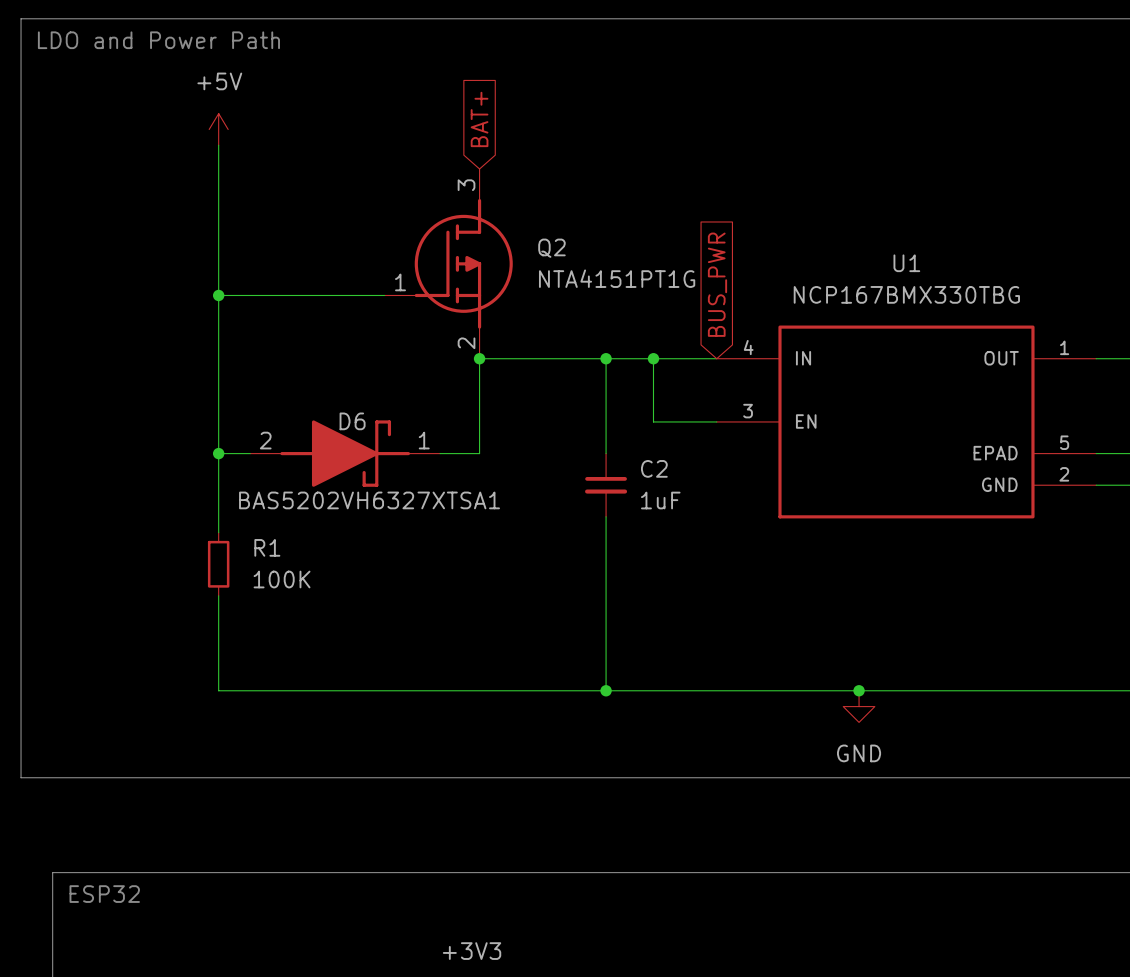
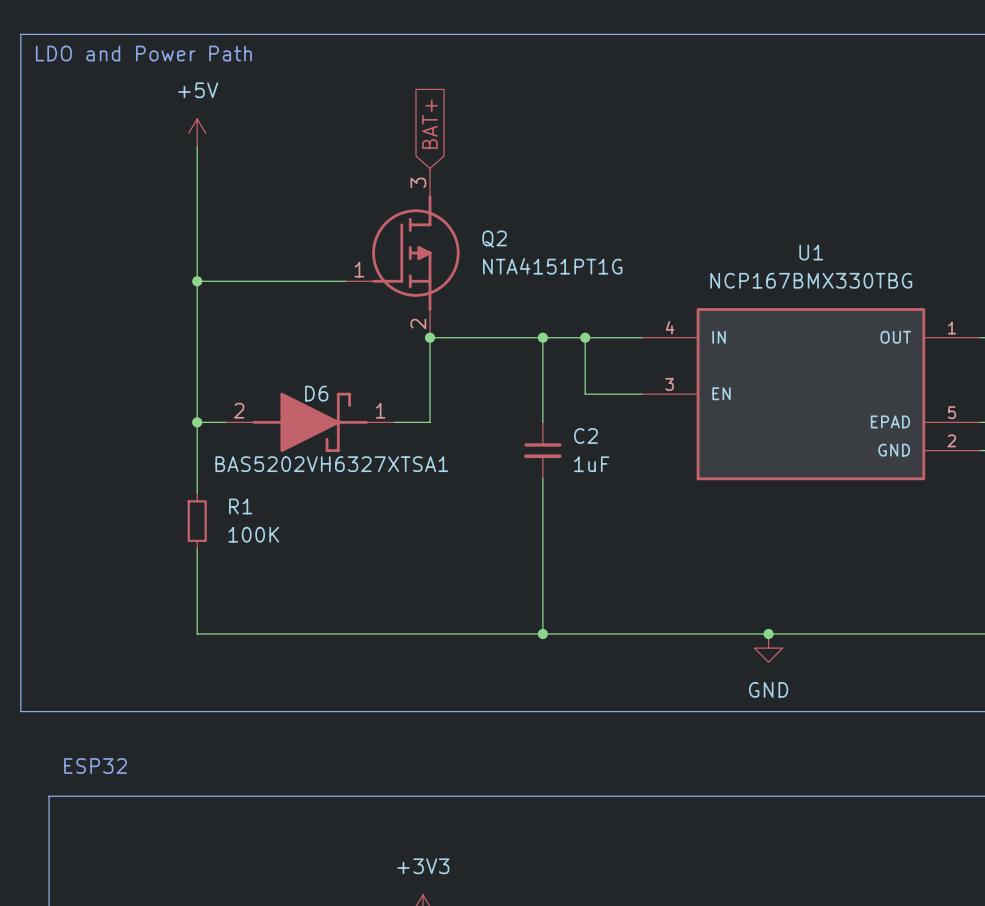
global label: BUS_PWR (717, 284) -> none
text position: ESP32 (104, 894) -> ESP32 (95, 766)

